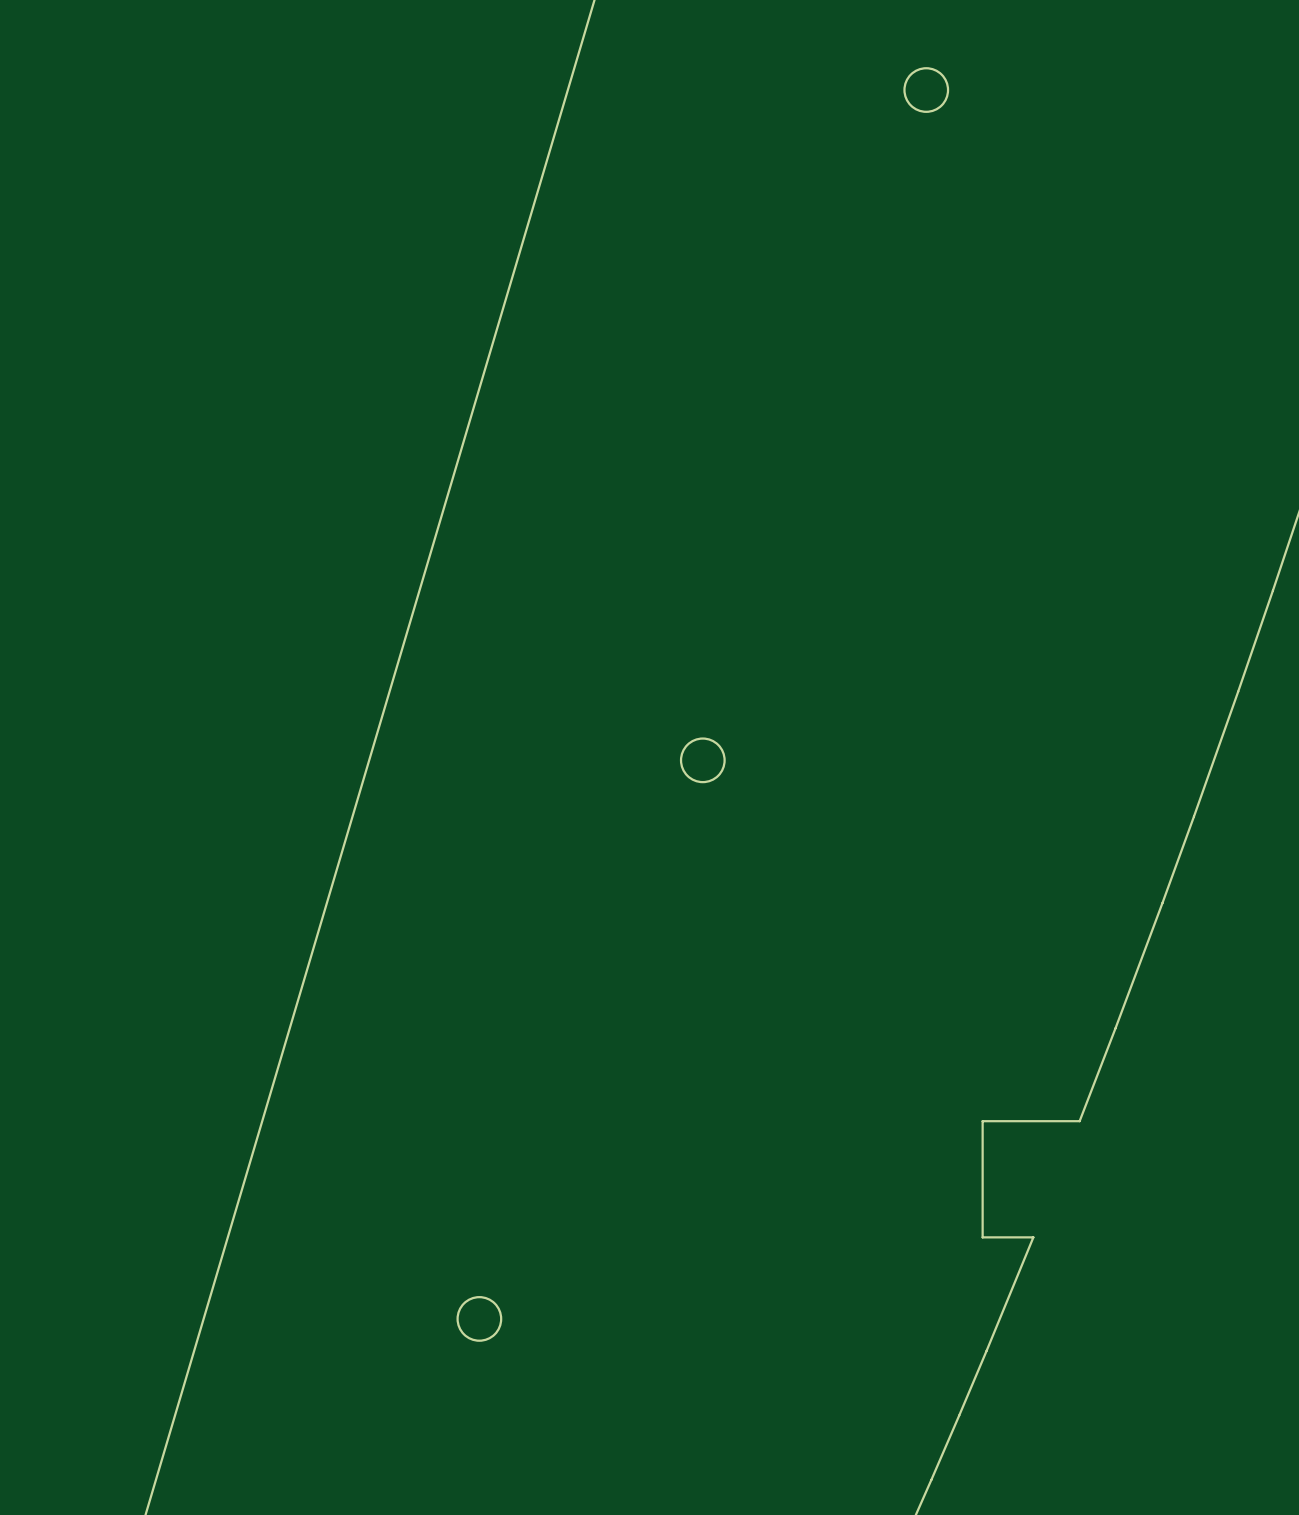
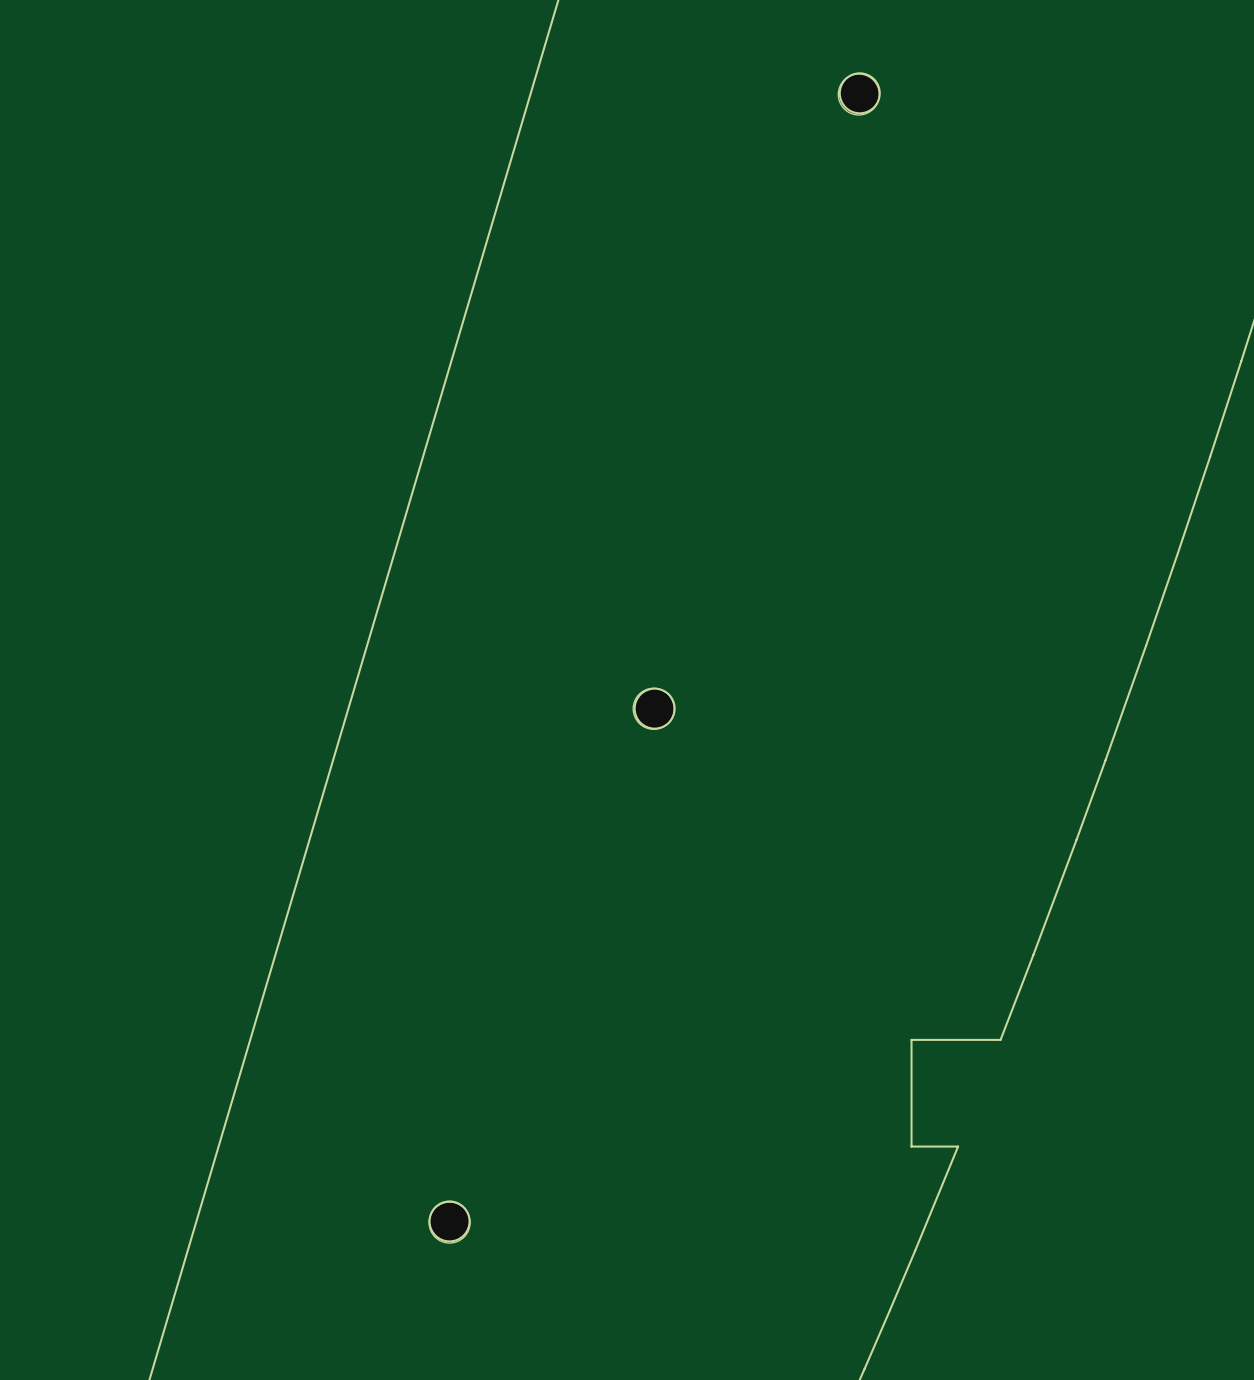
part: none -> (858, 94)
part: none -> (653, 708)
part: none -> (449, 1222)

